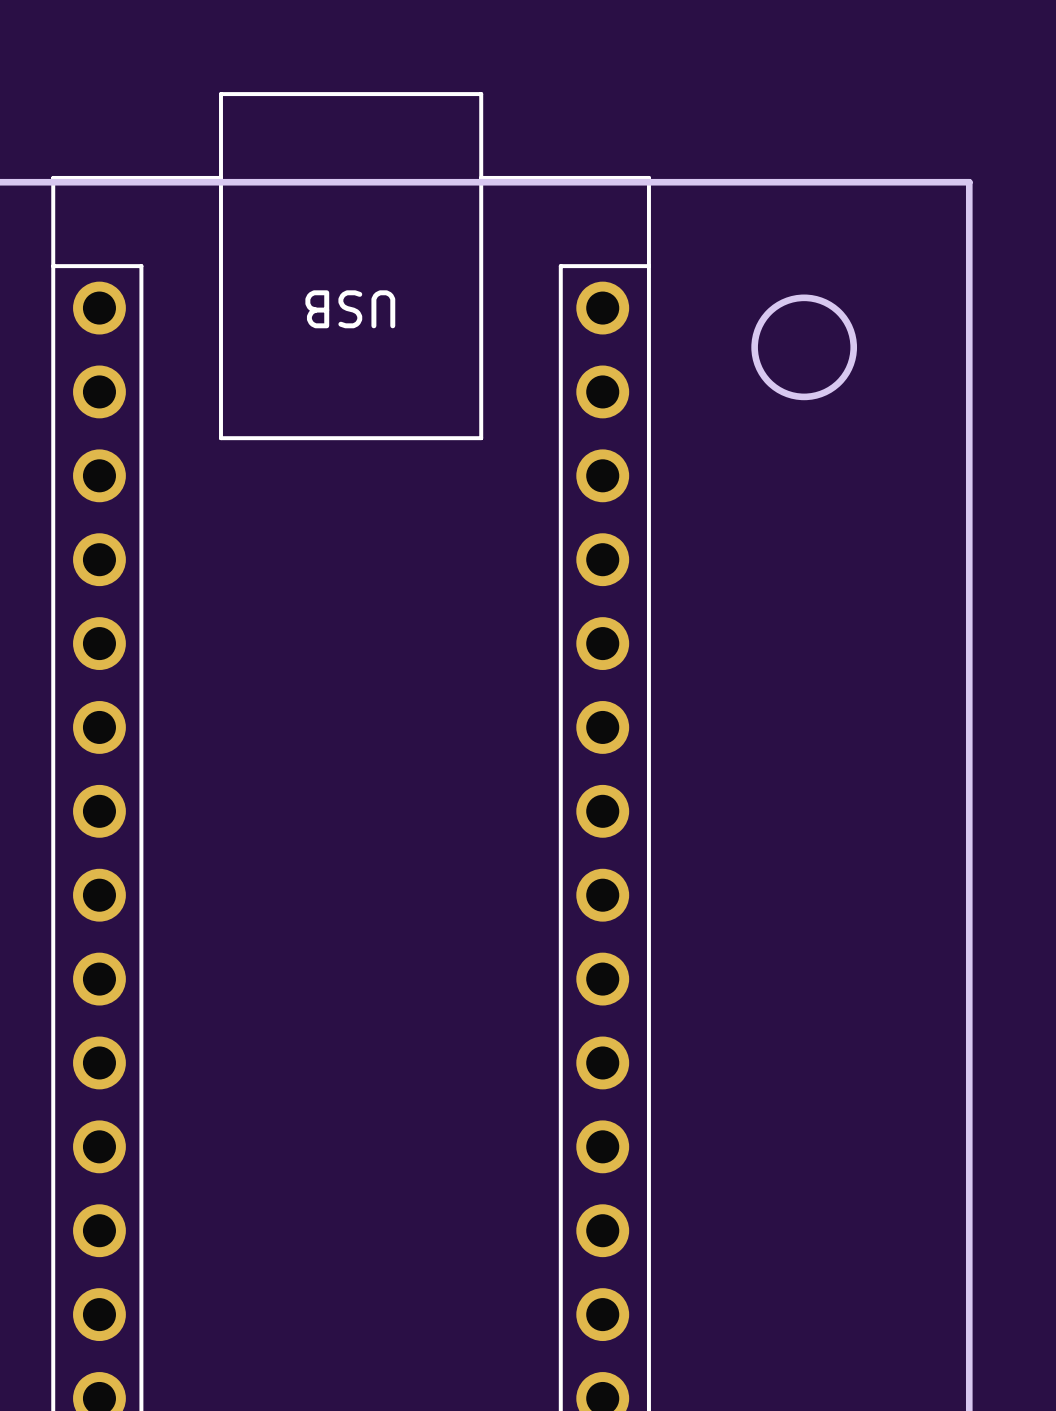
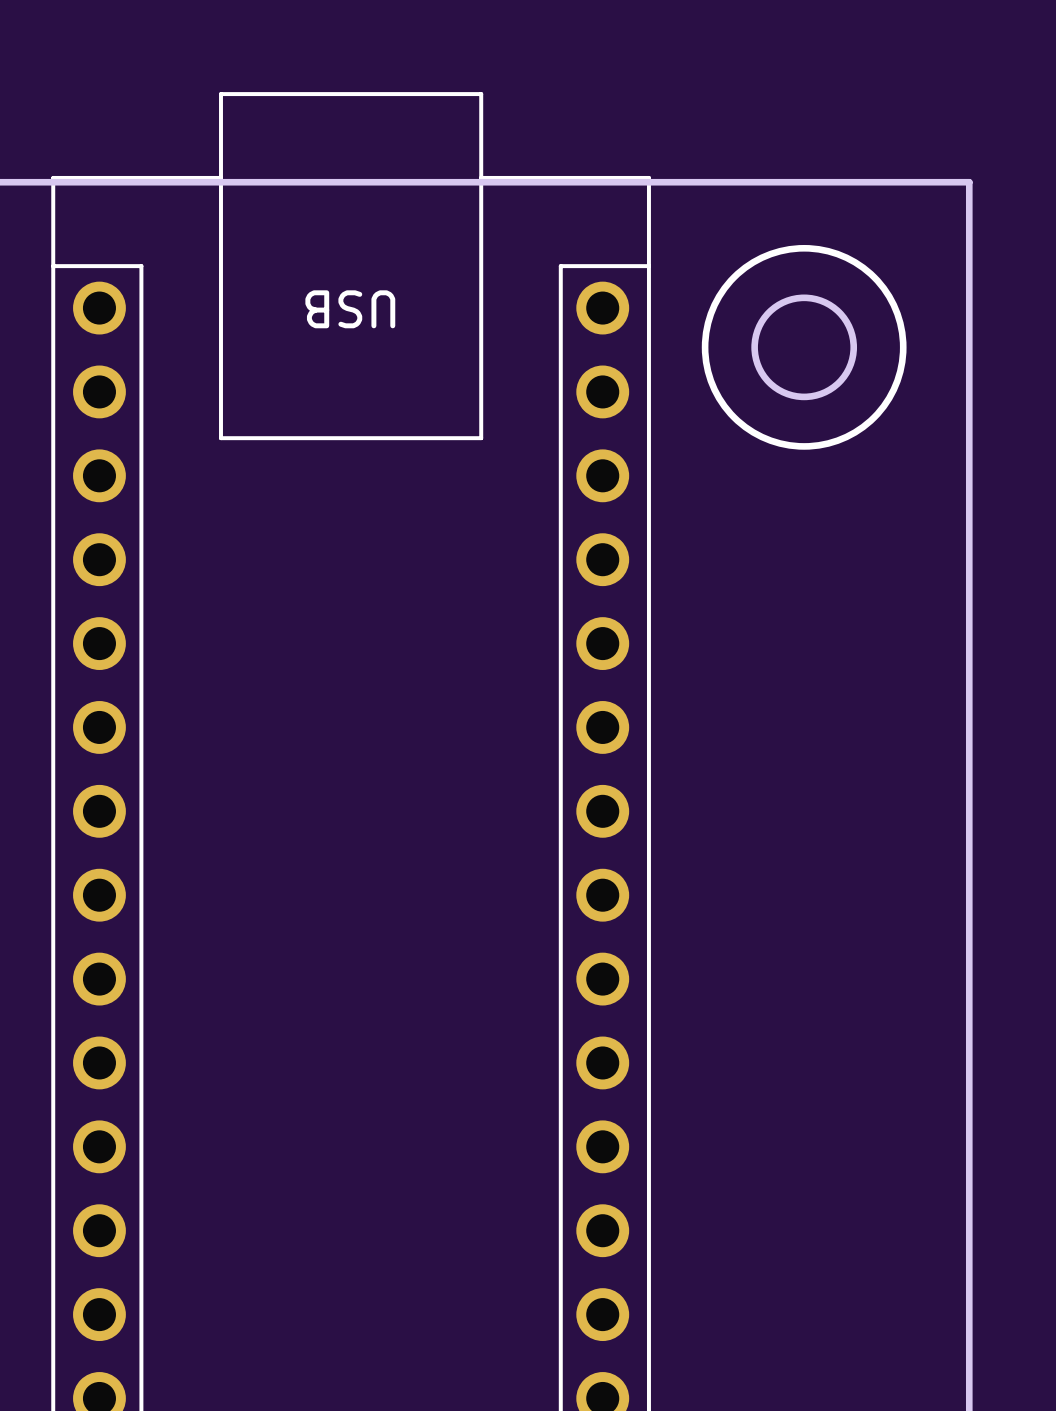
drawing: none -> [701, 244, 907, 450]

